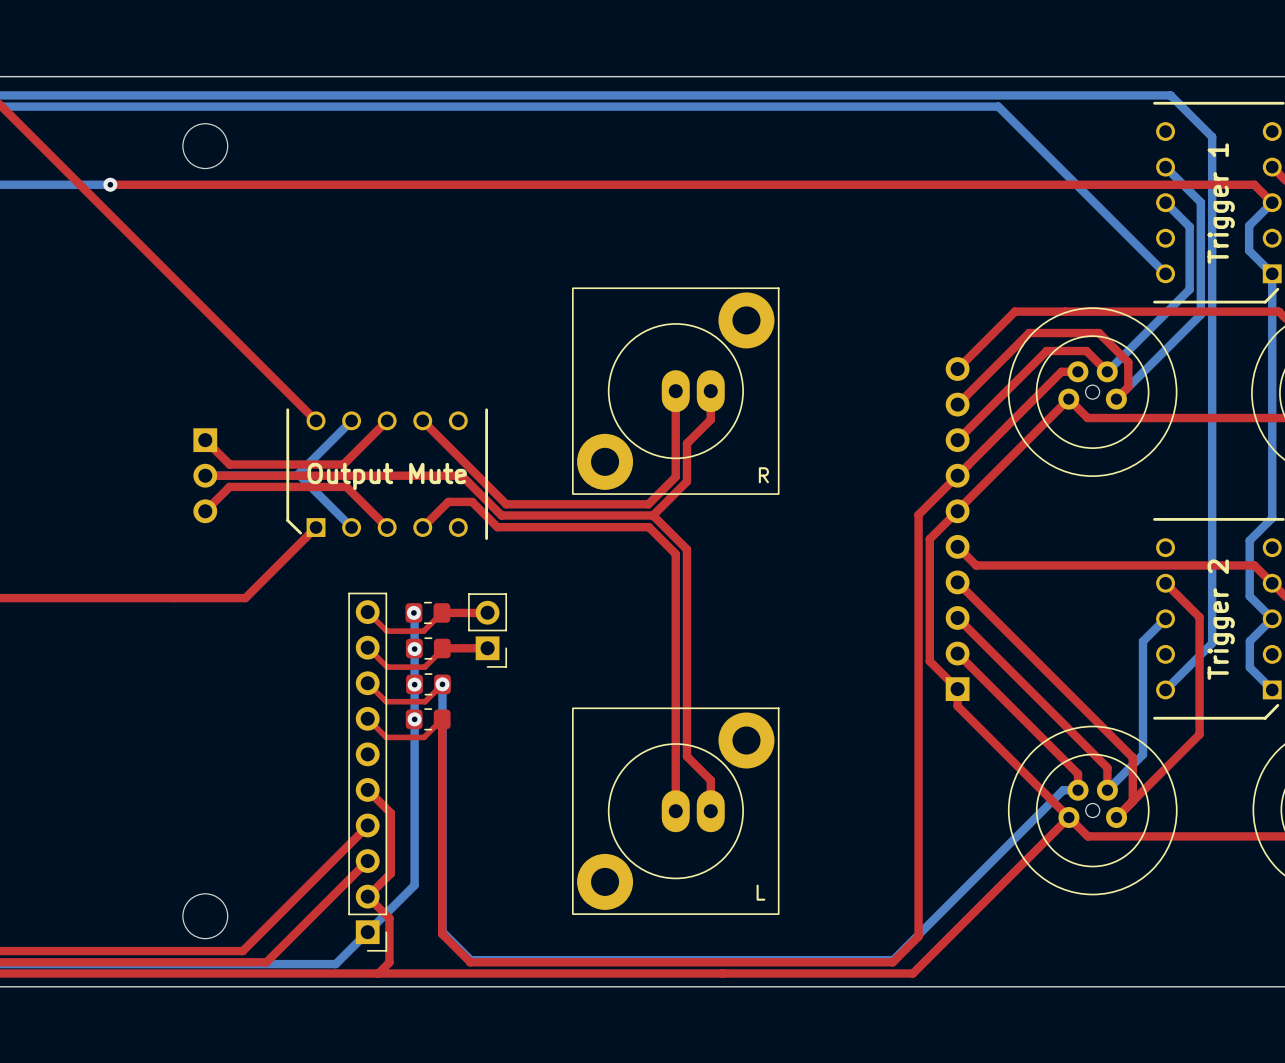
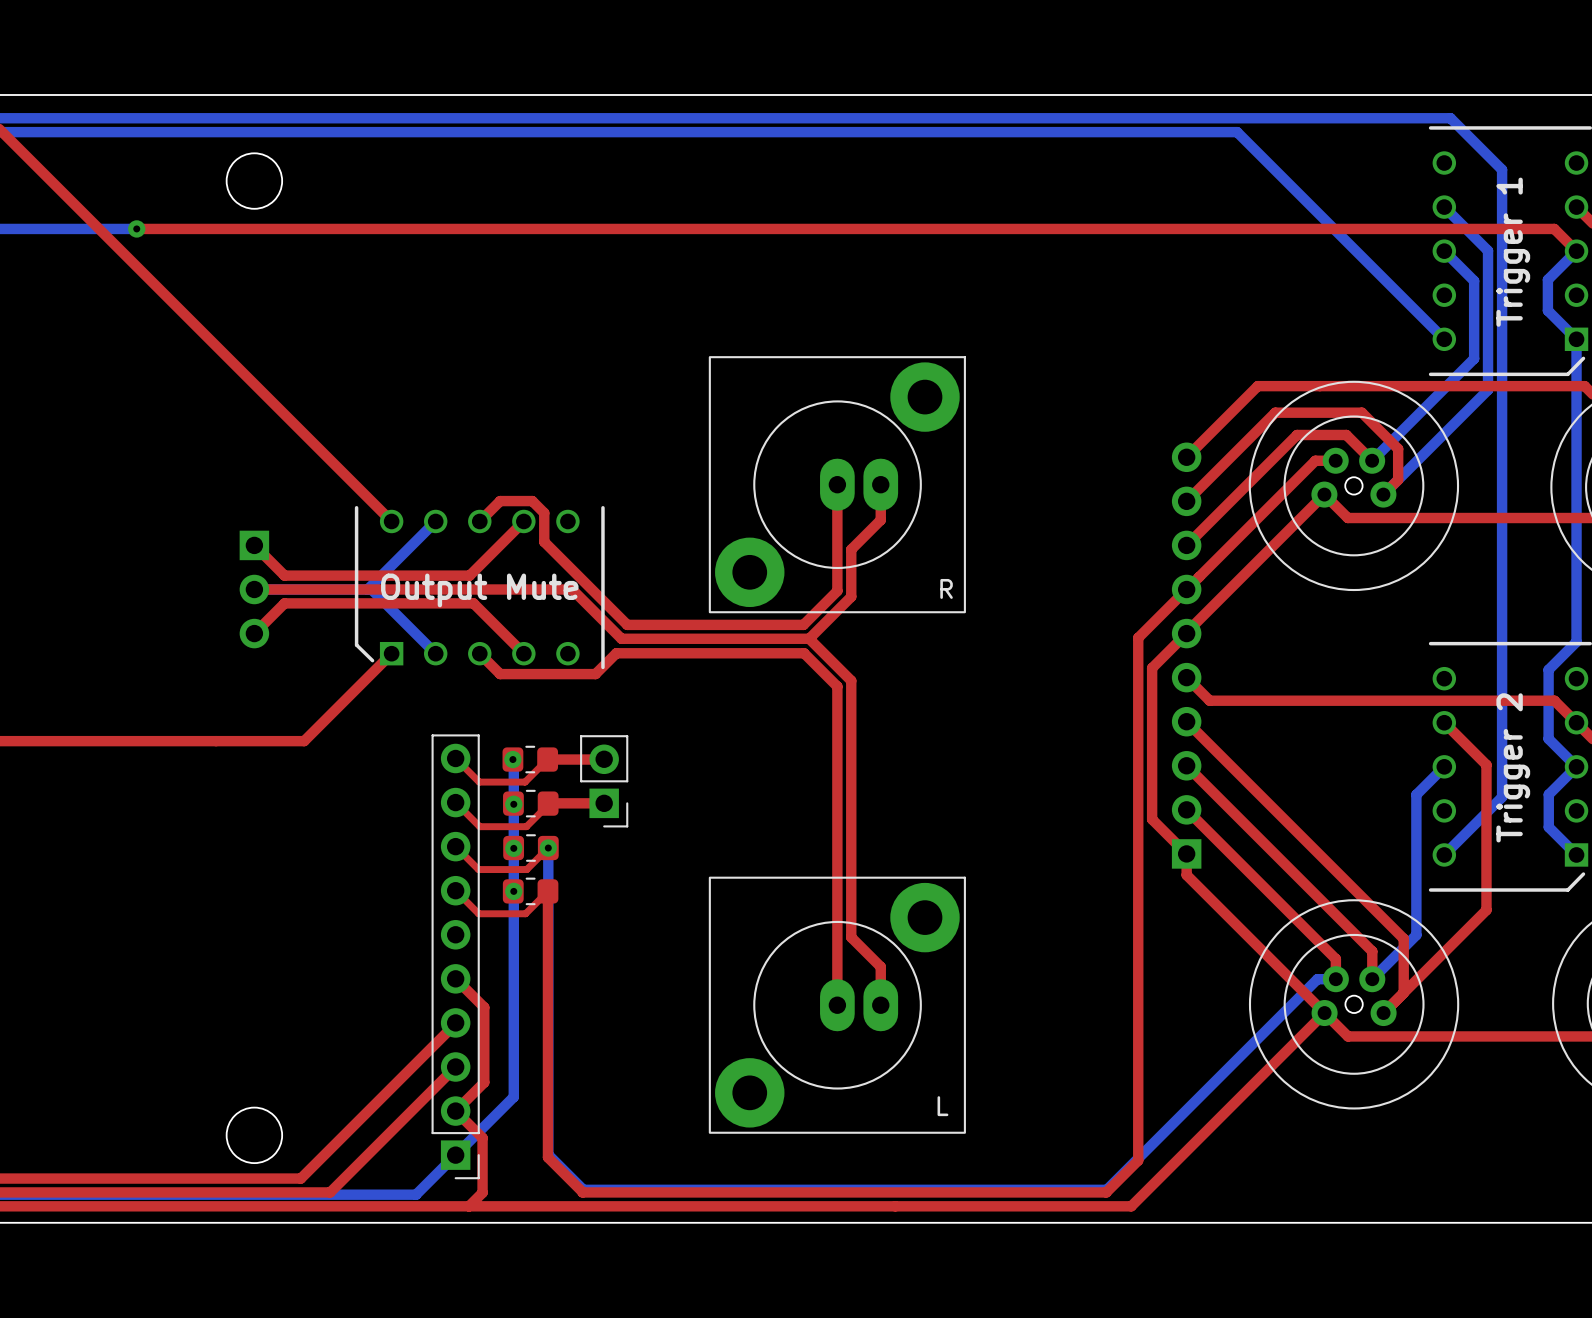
top track: (387, 420) (343, 464) -> (523, 521) (469, 575) (425, 575)
top track: (422, 420) (439, 437) -> (479, 521) (500, 501) (532, 501) (544, 513) (544, 541)
top track: (346, 486) (387, 527) -> (429, 603) (473, 603) (523, 653)
top track: (497, 527) (472, 501) (448, 501) (422, 527) -> (616, 653) (595, 674) (500, 674) (479, 653)

